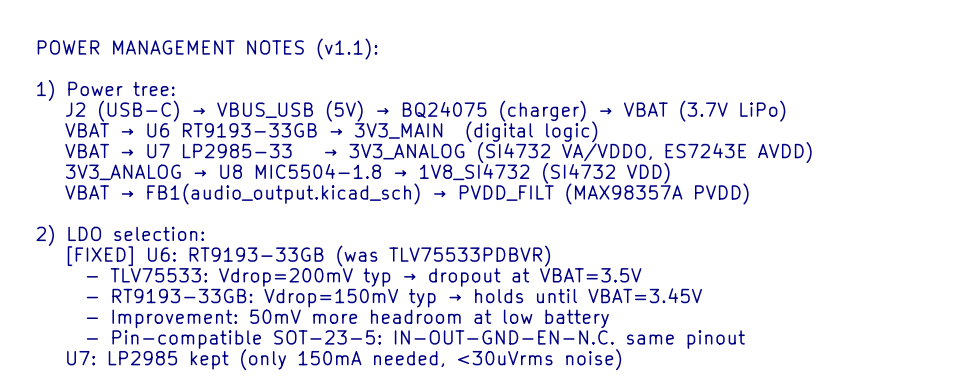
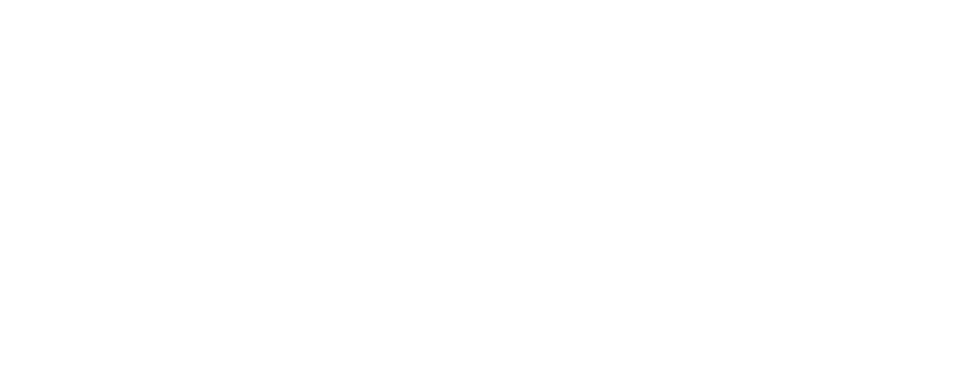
text: POWER MANAGEMENT NOTES (v1.1): (207, 49) -> none
text: 1) Power tree: (105, 90) -> none
text: J2 (USB-C) → VBUS_USB (5V) → BQ24075 (charger) → VBAT (3.7V LiPo) (425, 111) -> none
text: VBAT → U6 RT9193-33GB → 3V3_MAIN (digital logic) (331, 131) -> none
text: VBAT → U7 LP2985-33 → 3V3_ANALOG (SI4732 VA/VDDO, ES7243E AVDD) (438, 152) -> none
text: 3V3_ANALOG → U8 MIC5504-1.8 → 1V8_SI4732 (SI4732 VDD) (367, 173) -> none
text: VBAT → FB1(audio_output.kicad_sch) → PVDD_FILT (MAX98357A PVDD) (406, 193) -> none
text: 2) LDO selection: (120, 235) -> none
text: [FIXED] U6: RT9193-33GB (was TLV75533PDBVR) (308, 256) -> none
text: - TLV75533: Vdrop=200mV typ → dropout at VBAT=3.5V (364, 277) -> none
text: - RT9193-33GB: Vdrop=150mV typ → holds until VBAT=3.45V (394, 297) -> none
text: - Improvement: 50mV more headroom at low battery (347, 318) -> none
text: - Pin-compatible SOT-23-5: IN-OUT-GND-EN-N.C. same pinout (415, 339) -> none
text: U7: LP2985 kept (only 150mA needed, <30uVrms noise) (344, 359) -> none

